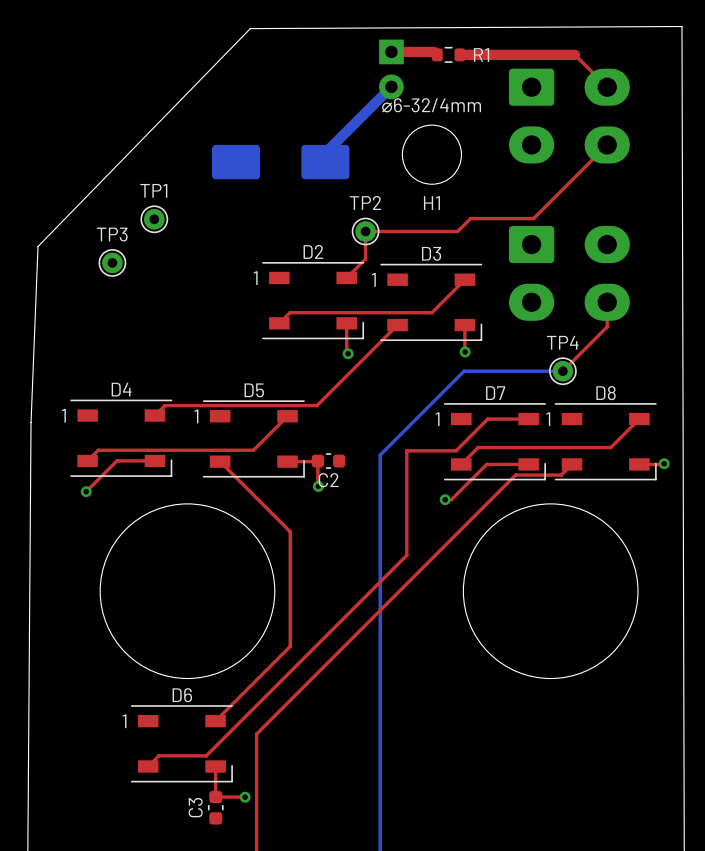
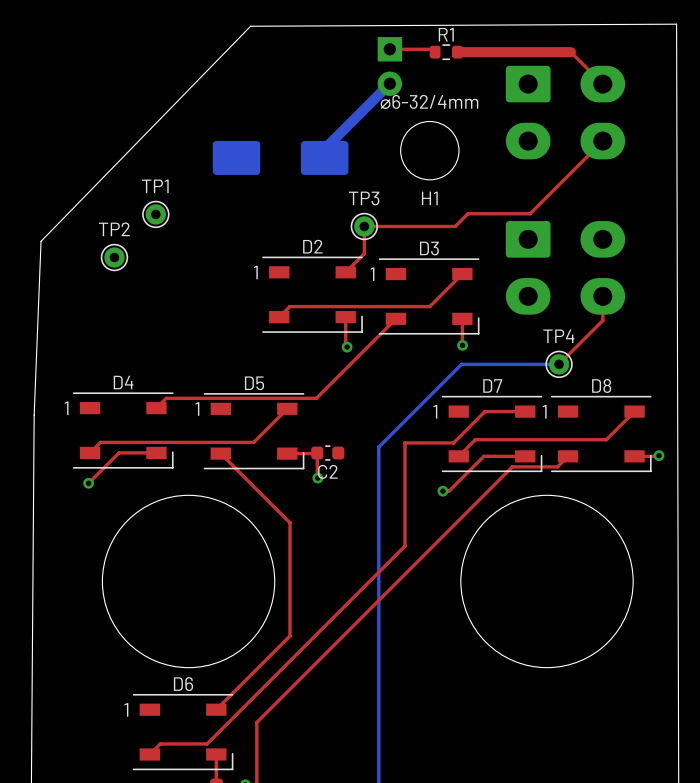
top track width: thick (391, 51) (434, 51) -> thin (389, 49) (432, 49)
R1 name position: R1 (481, 54) -> R1 (446, 34)
TP2 name: TP2 (365, 202) -> TP3 (364, 198)
TP3 name: TP3 (112, 234) -> TP2 (114, 229)

